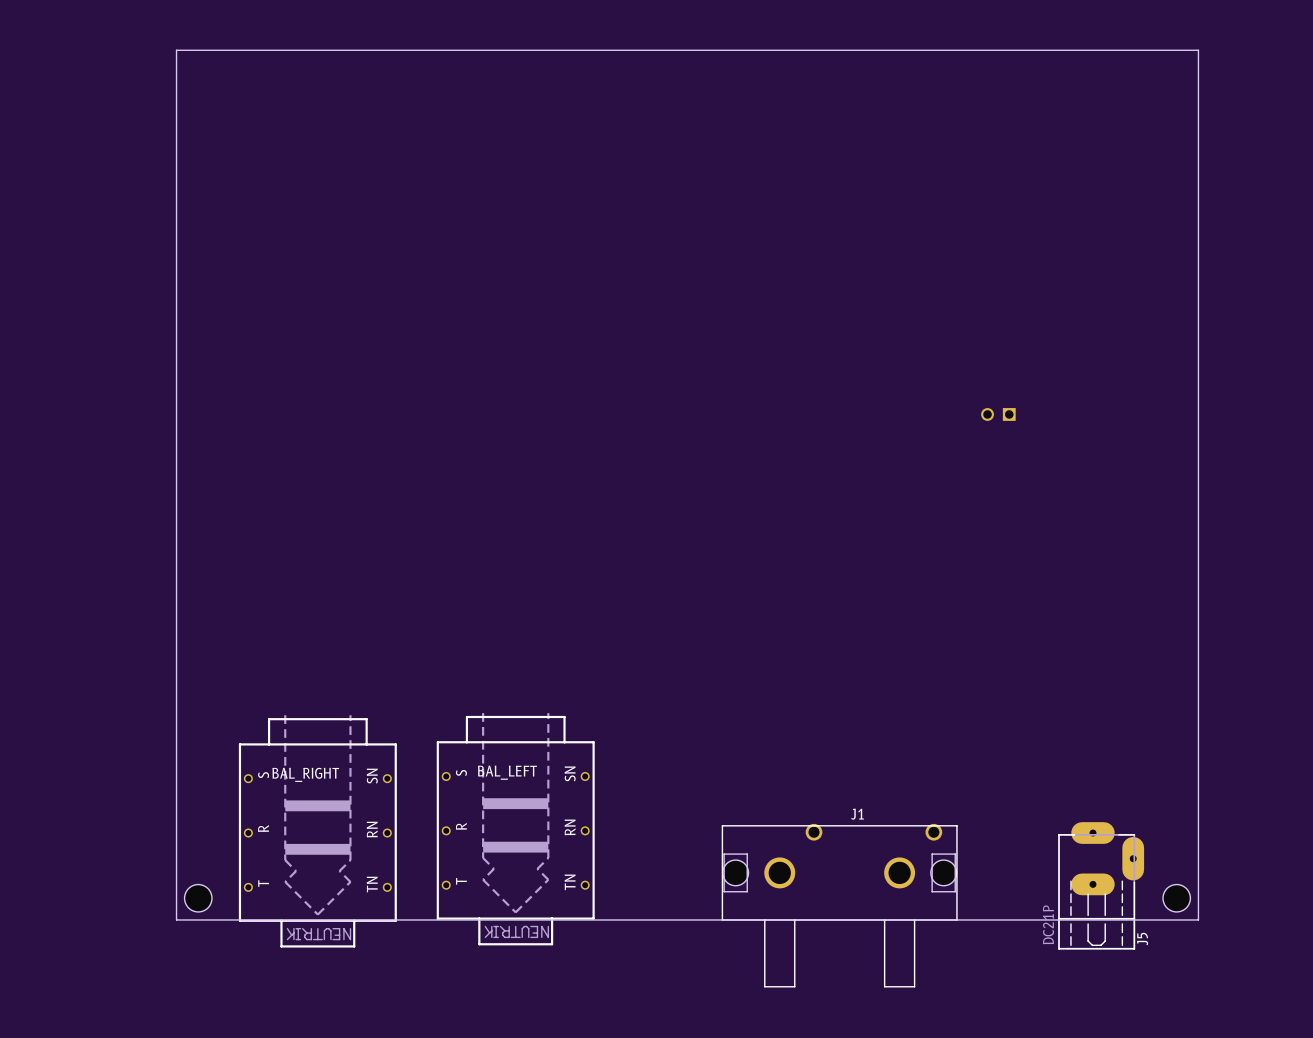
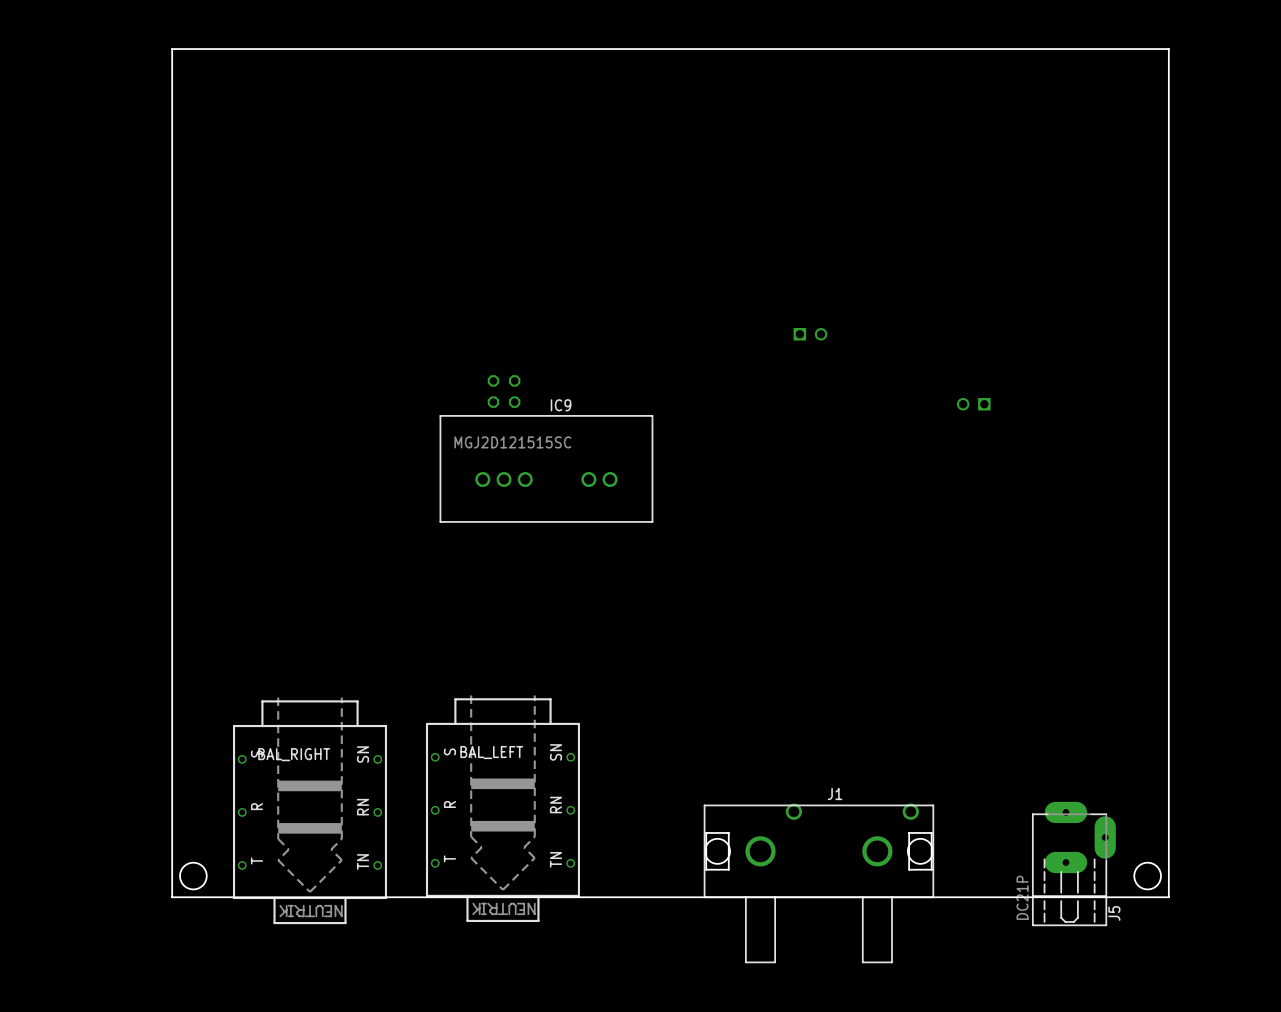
part: none -> (810, 334)
part: none -> (504, 391)
IC9: none -> MGJ2D121515SC (546, 468)

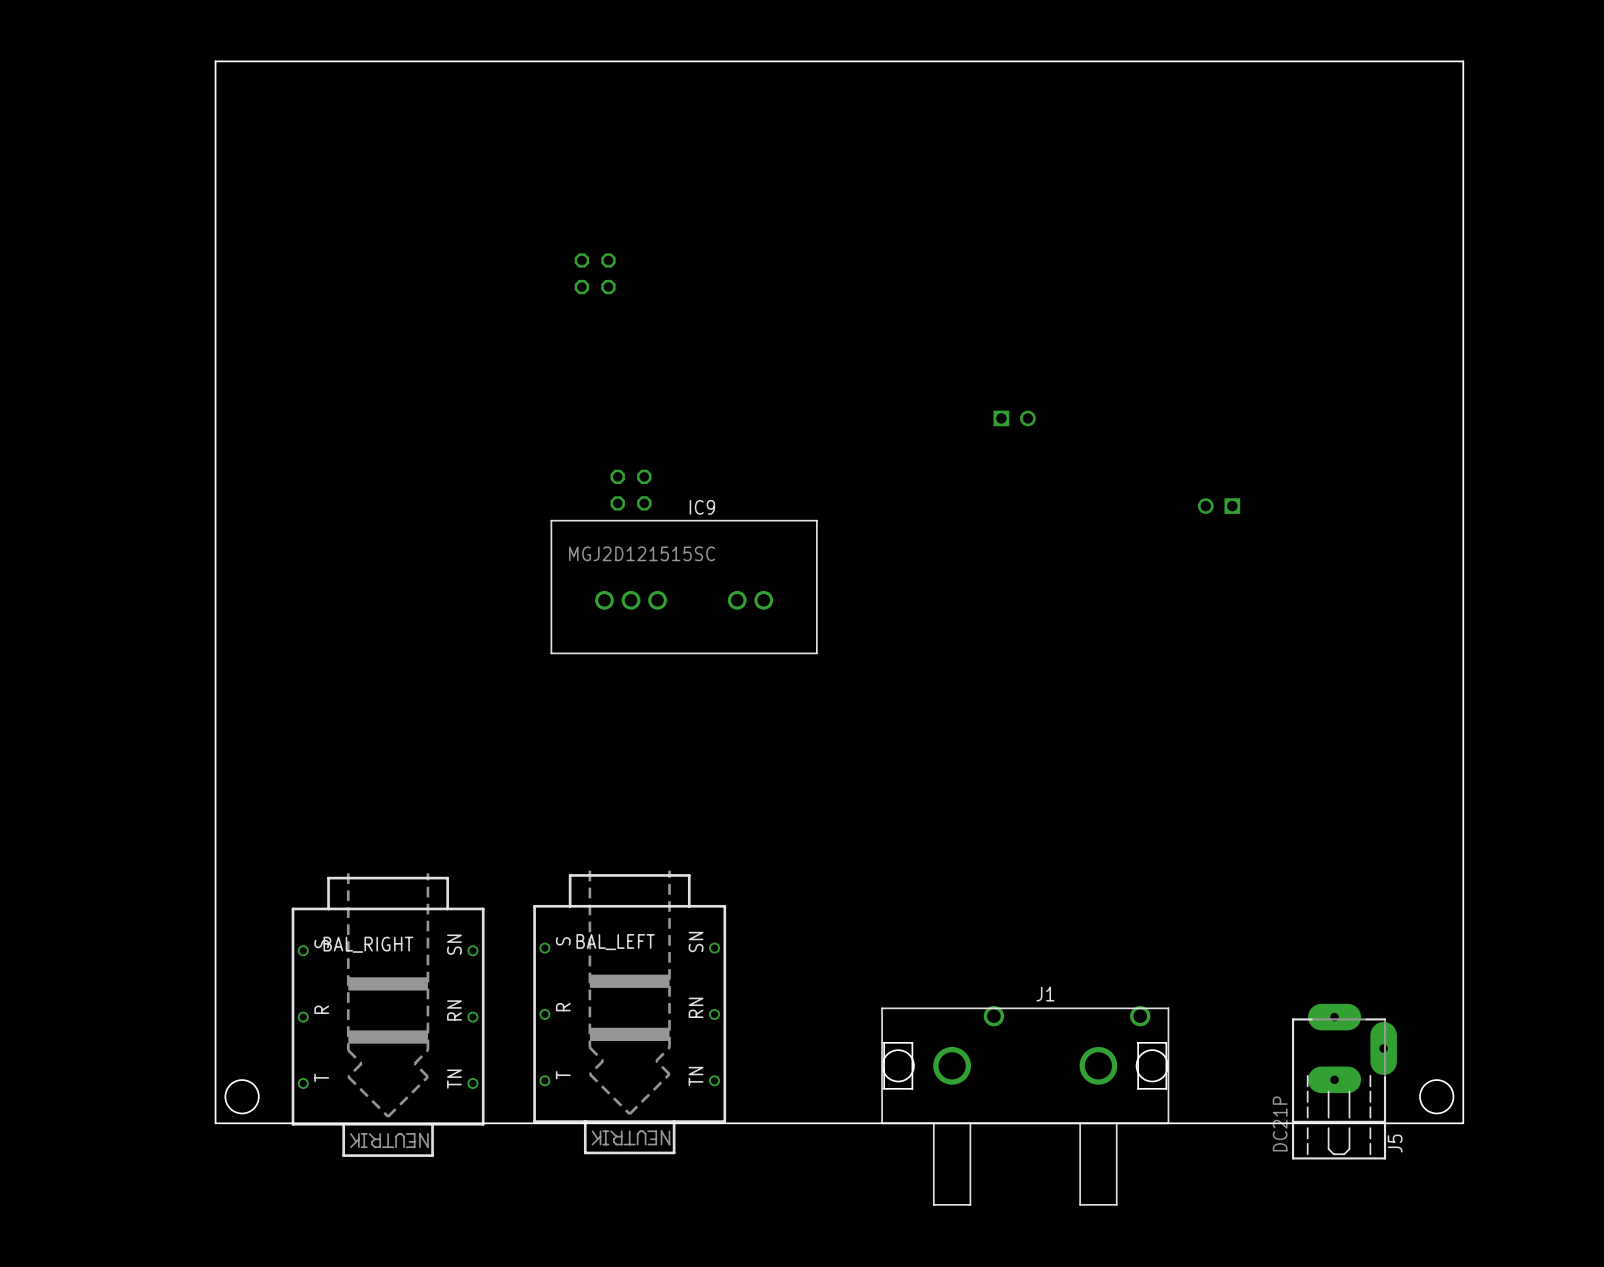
part: none -> (595, 273)

